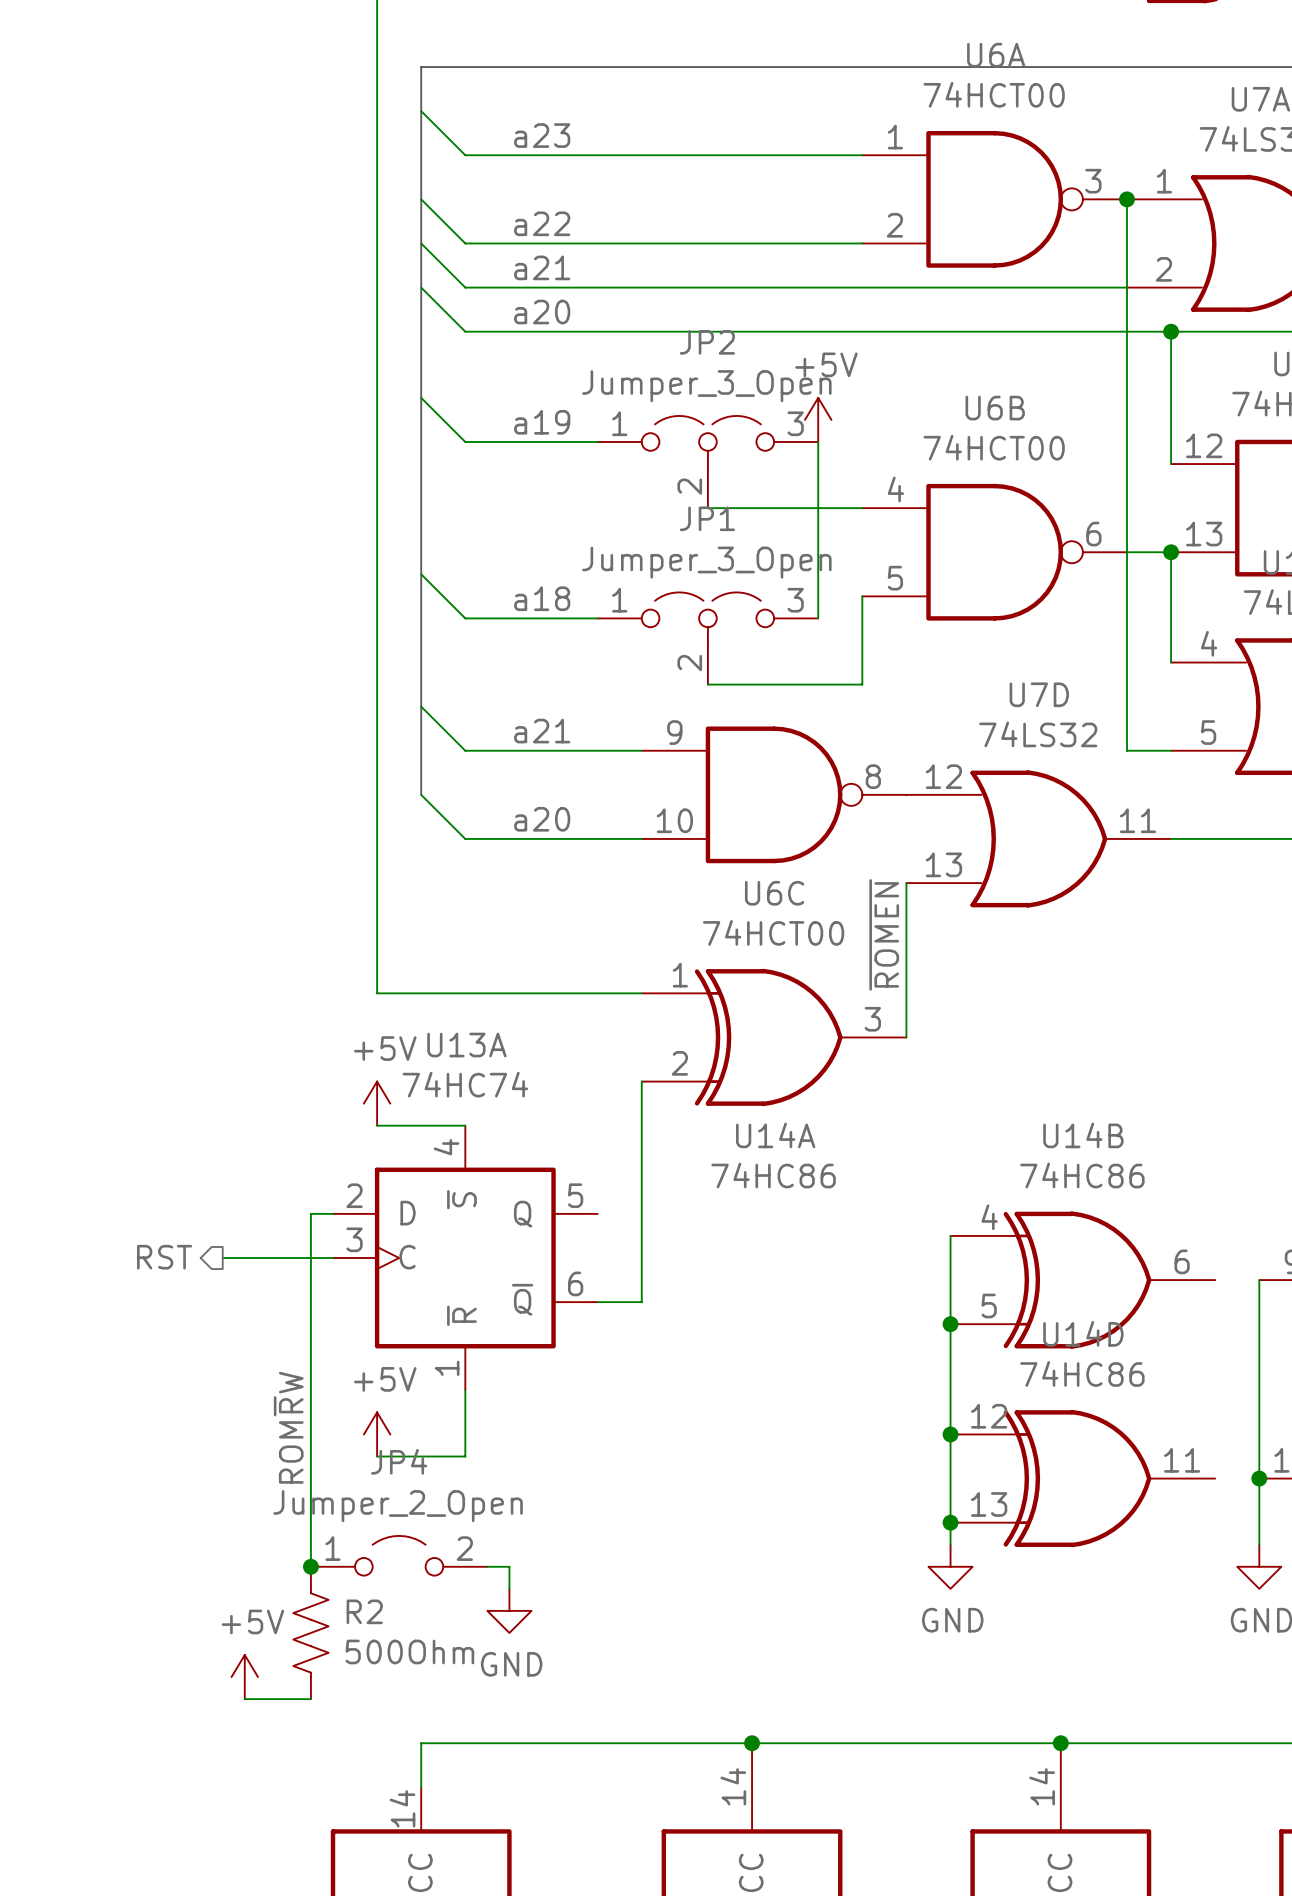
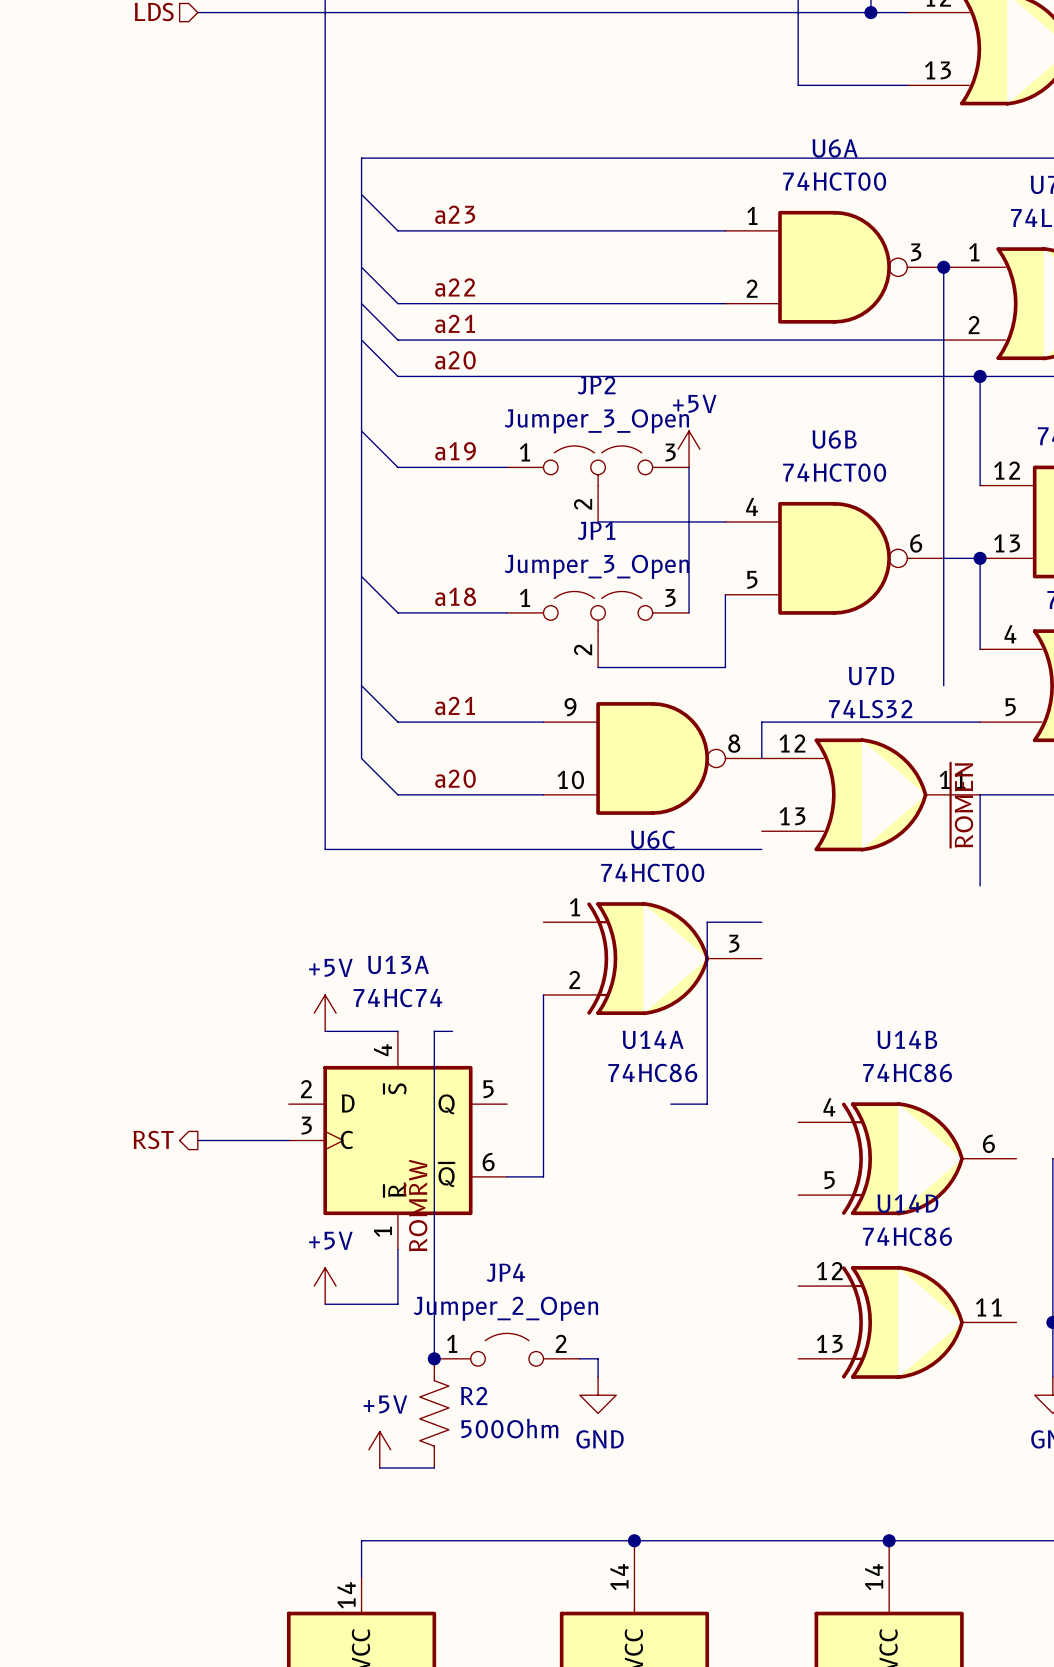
wire: (1126, 706) (1126, 750) -> (761, 758) (761, 722) (943, 722)
wire: none -> (980, 794) (980, 885)
wire: (906, 883) (906, 1037) -> none
wire: (377, 905) (377, 993) (641, 993) -> (325, 849) (761, 849)
label position: ~{ROMEN} (884, 934) -> ~{ROMEN} (961, 805)
wire: none -> (761, 922) (707, 922) (707, 1104) (670, 1104)
wire: none -> (452, 1031) (434, 1031) (434, 1358)
wire: (332, 1213) (310, 1213) (310, 1566) -> none
wire: (950, 1235) (950, 1544) -> none
junction: (950, 1324) -> none
label position: ROM~{R}W (288, 1427) -> ROM~{R}W (416, 1205)
junction: (950, 1434) -> none
junction: none -> (434, 1358)
junction: (950, 1522) -> none
JP4 position: (399, 1555) -> (507, 1349)
junction: (310, 1566) -> none
wire: (487, 1566) (509, 1566) (509, 1588) -> (579, 1358) (598, 1358) (598, 1377)
power symbol: none -> GND (598, 1395)
power symbol: GND (950, 1566) -> none
power symbol: GND (509, 1610) -> none
R2 position: (310, 1632) -> (434, 1413)
power symbol position: +5V (244, 1677) -> +5V (379, 1449)
wire: (244, 1699) (310, 1699) -> (379, 1467) (434, 1467)

